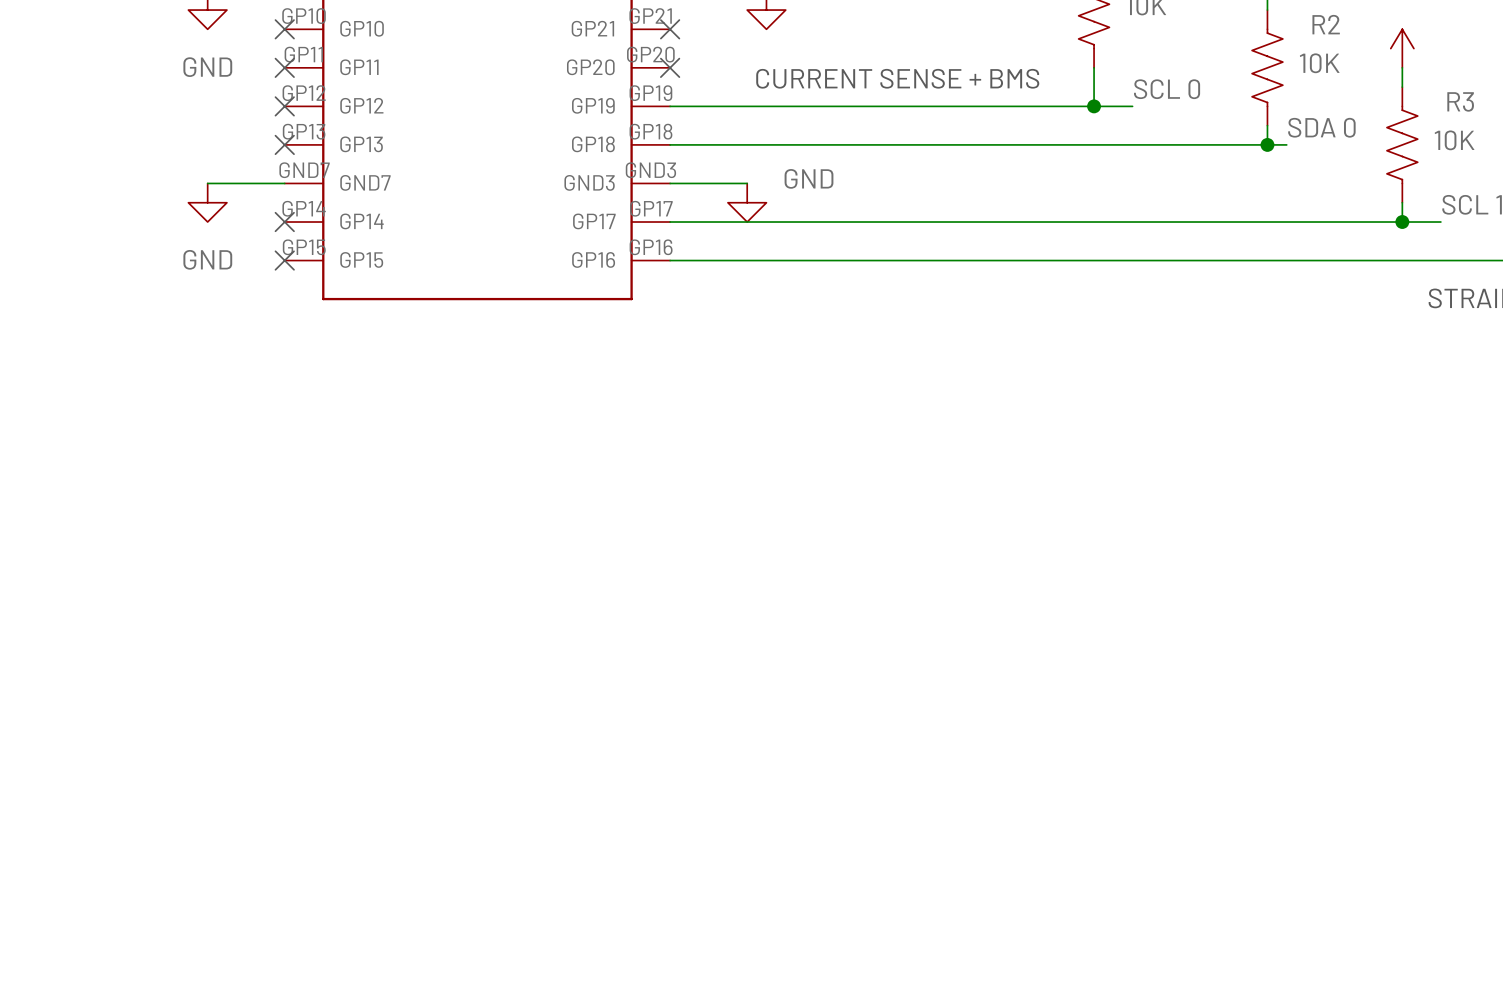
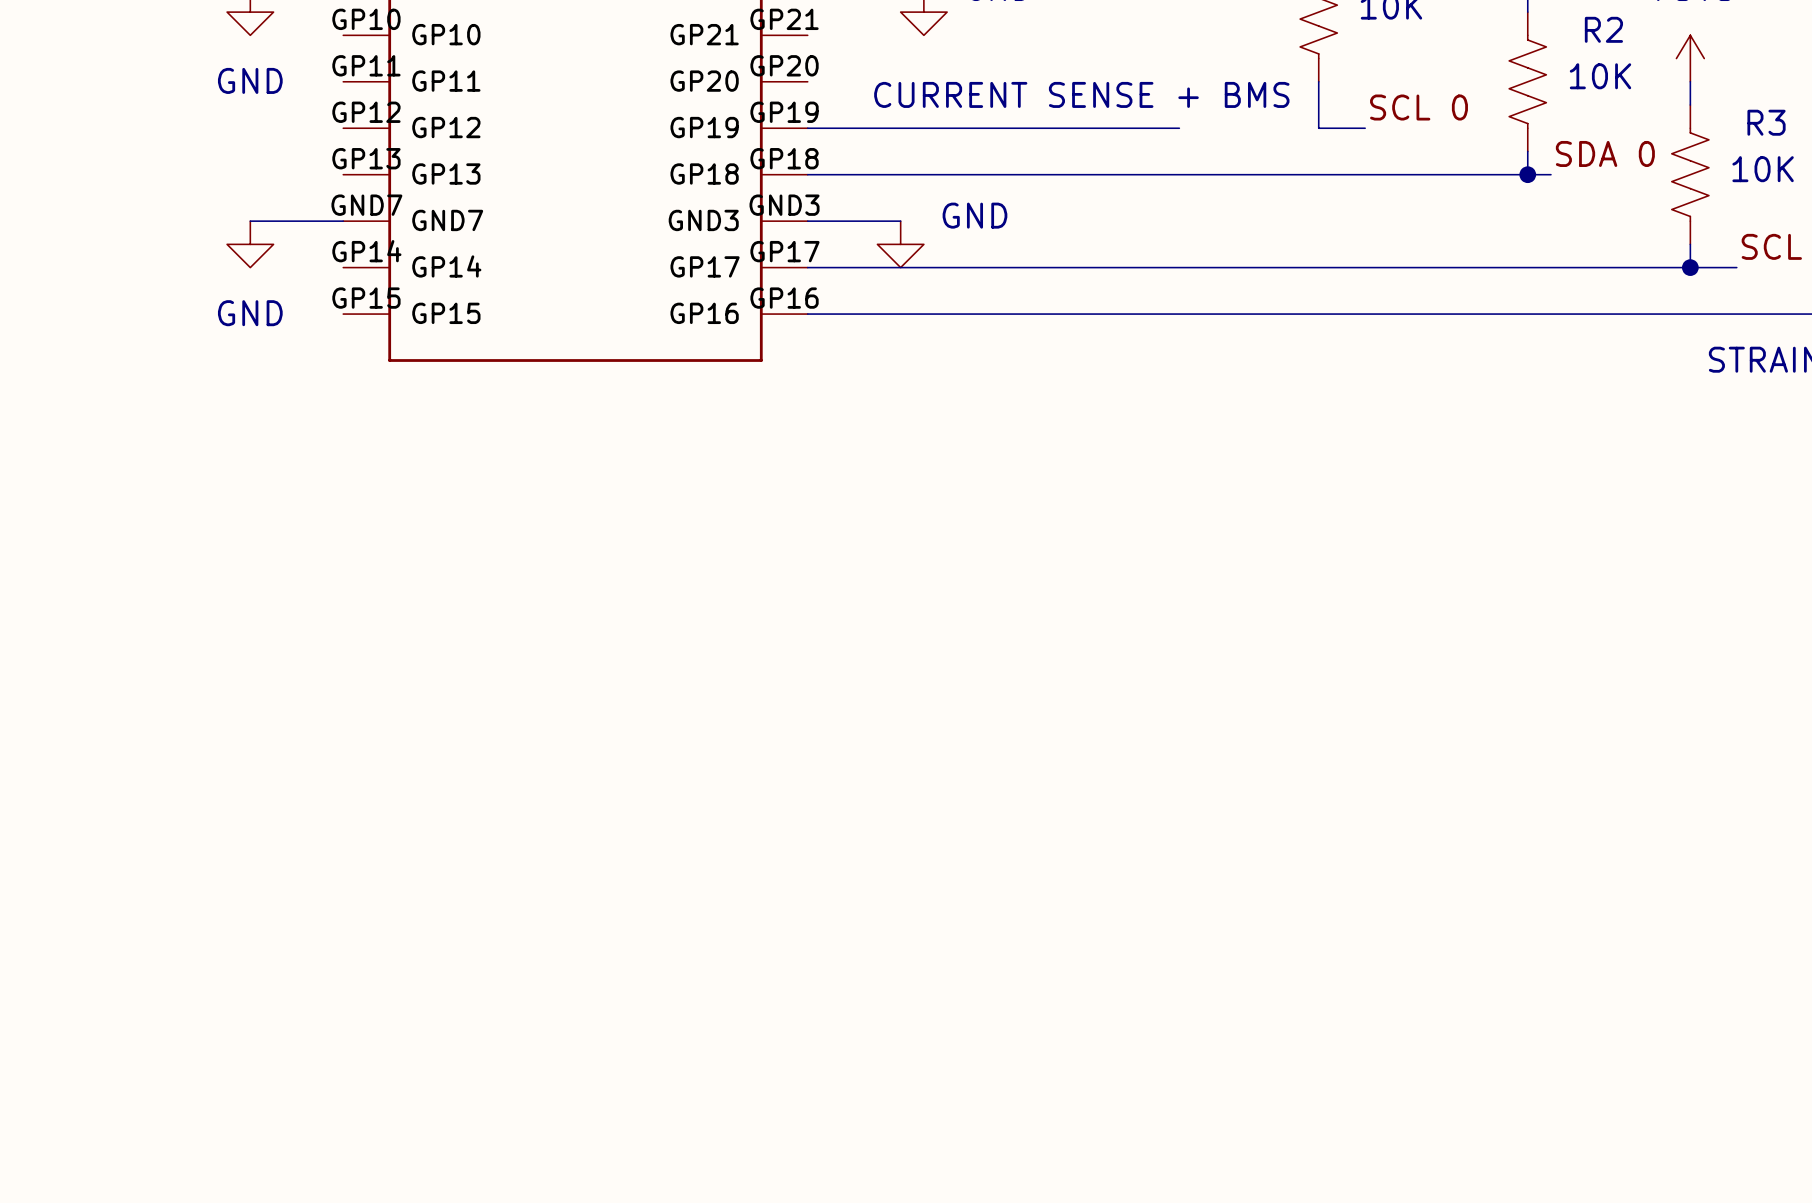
no-connect mark: (284, 29) -> none
no-connect mark: (670, 29) -> none
no-connect mark: (284, 67) -> none
no-connect mark: (670, 67) -> none
no-connect mark: (284, 106) -> none
wire: (978, 106) (1094, 106) -> none
junction: (1094, 106) -> none
no-connect mark: (284, 144) -> none
no-connect mark: (284, 222) -> none
no-connect mark: (284, 260) -> none

